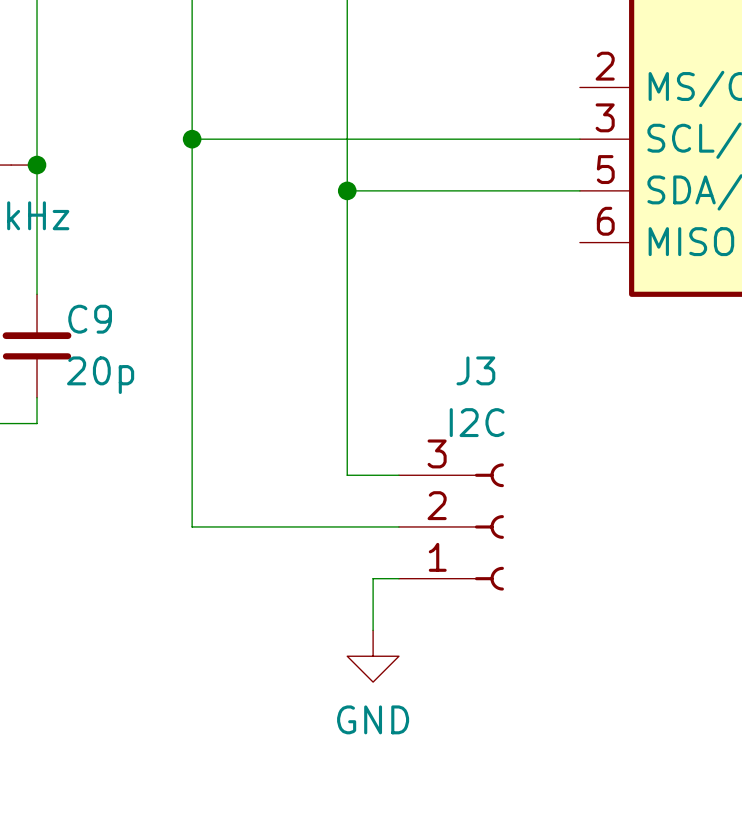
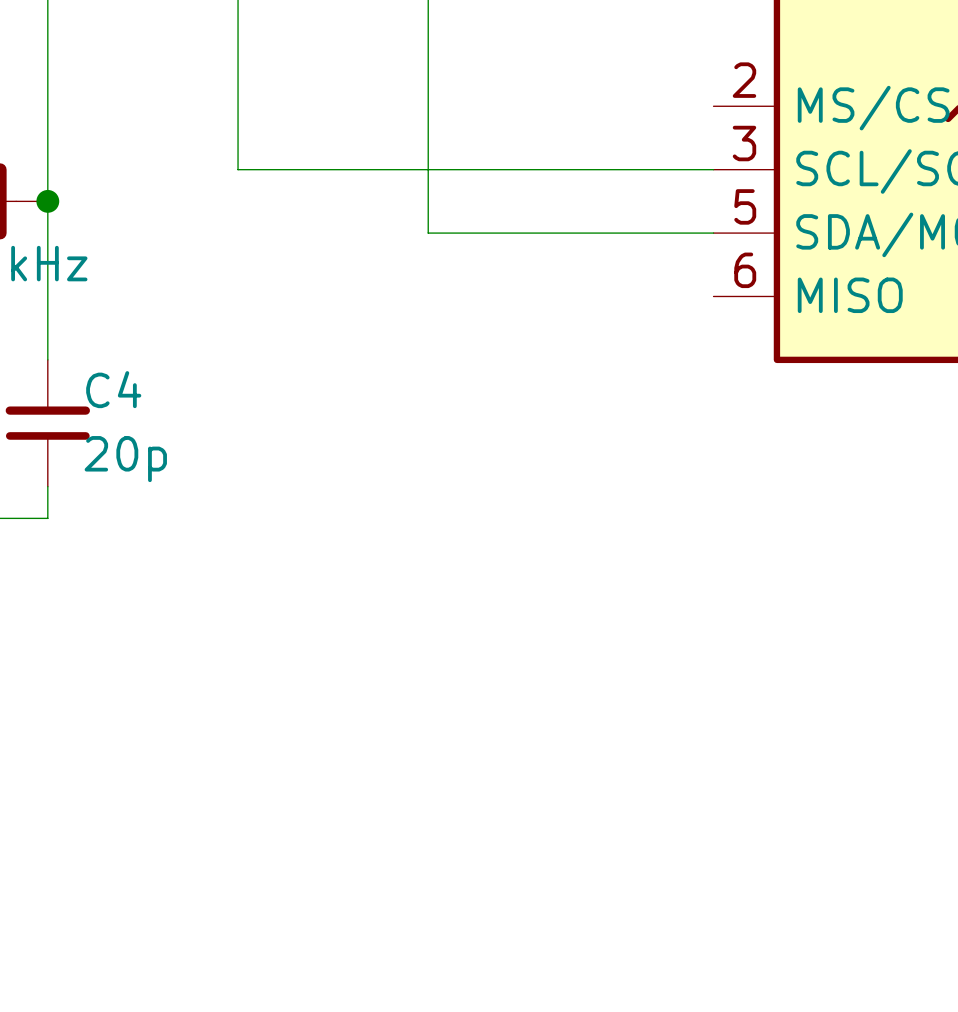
wire: (192, 139) (192, 526) (398, 526) -> none
junction: (192, 139) -> none
wire: (347, 190) (347, 475) (398, 475) -> none
junction: (347, 190) -> none
C9 name: C9 (90, 319) -> C4 (113, 389)
J3: I2C (451, 526) -> none
wire: (398, 578) (373, 578) (373, 630) -> none
power symbol: GND (373, 656) -> none

